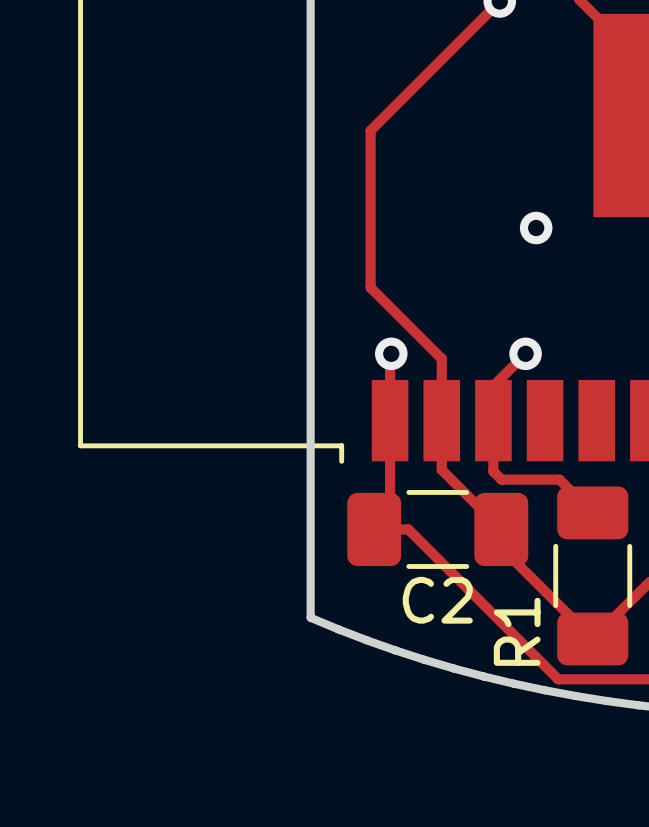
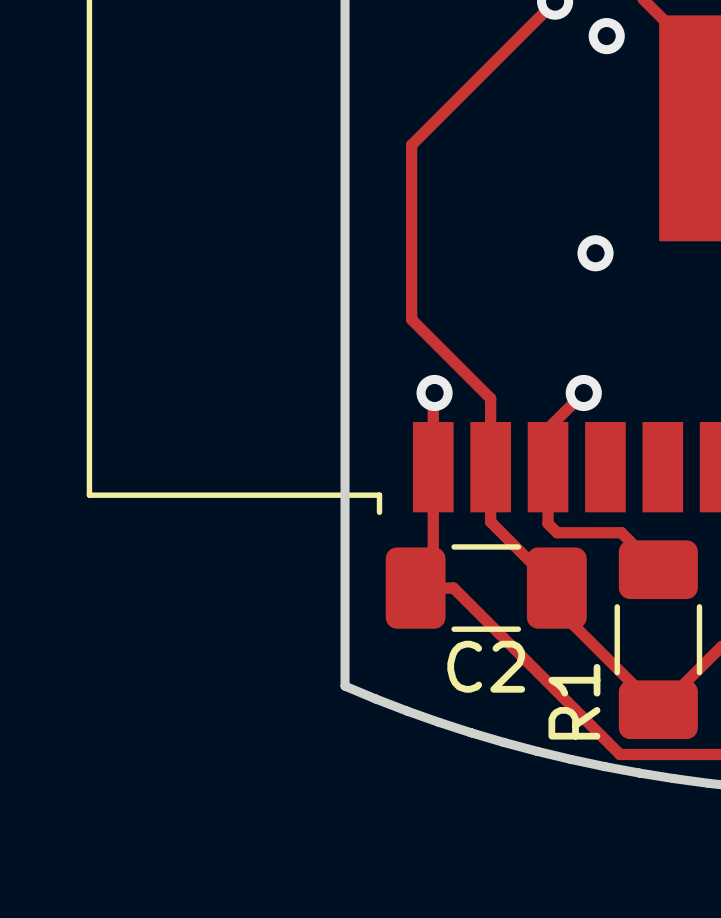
via: none -> (606, 36)

